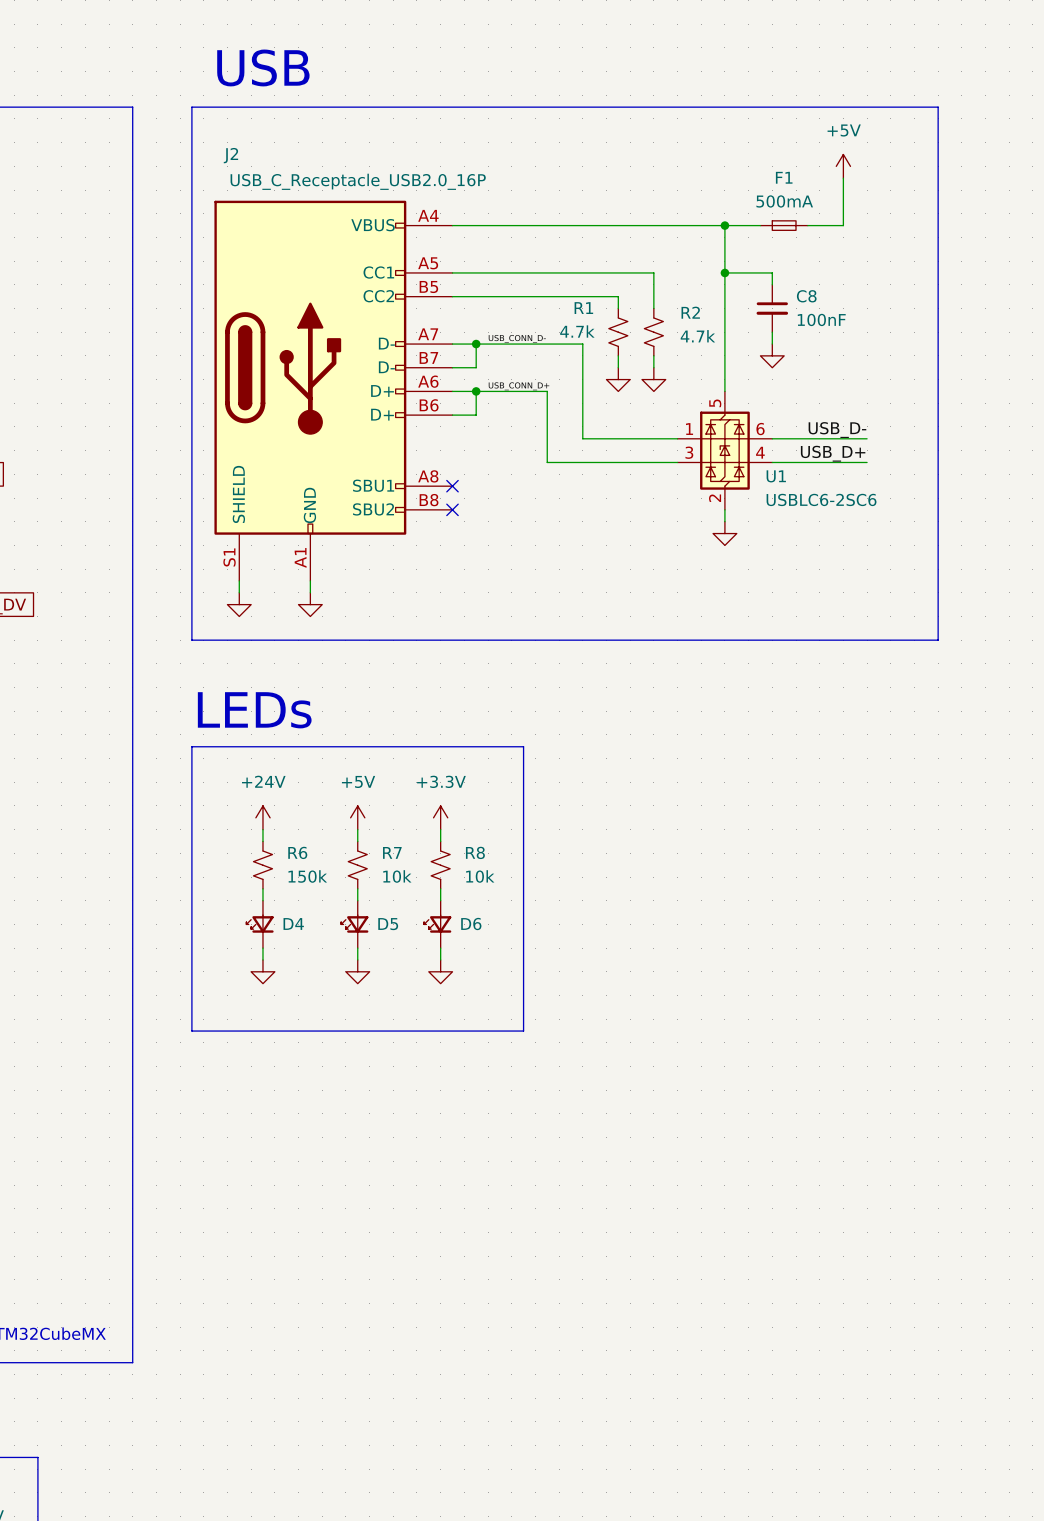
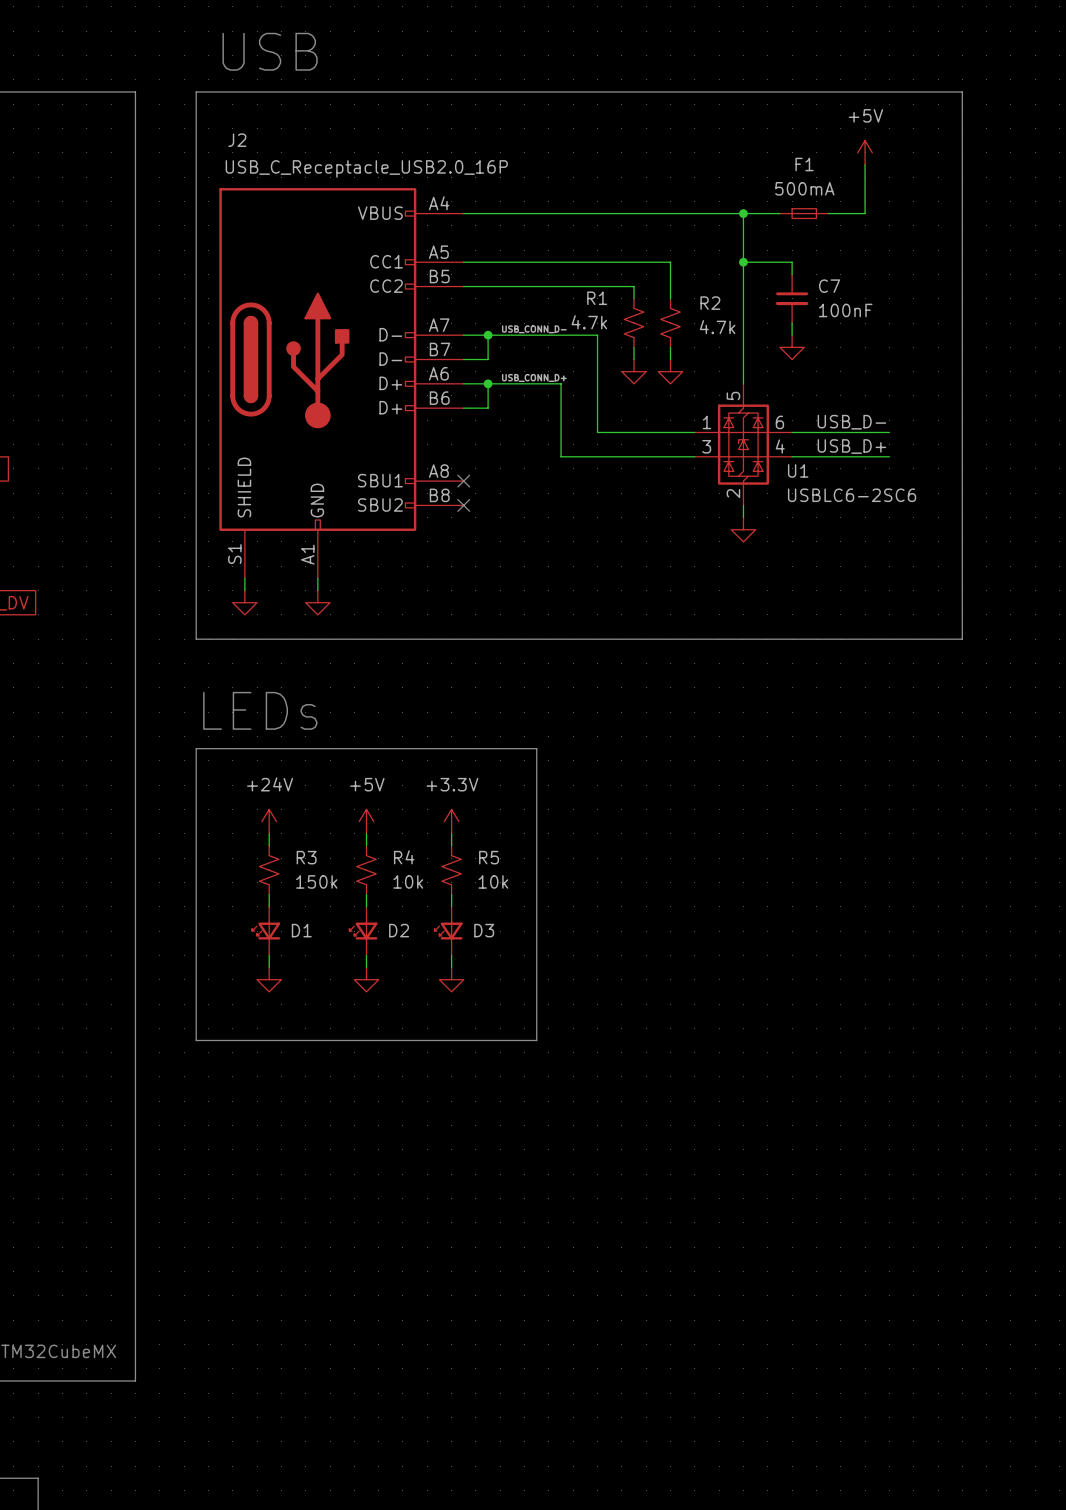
C8 name: C8 (806, 296) -> C7 (829, 286)
R6 name: R6 (297, 852) -> R3 (306, 857)
R7 name: R7 (392, 852) -> R4 (404, 857)
R8 name: R8 (475, 852) -> R5 (489, 857)
D4 name: D4 (293, 923) -> D1 (301, 930)
D5 name: D5 (388, 924) -> D2 (399, 930)
D6 name: D6 (471, 924) -> D3 (484, 930)

